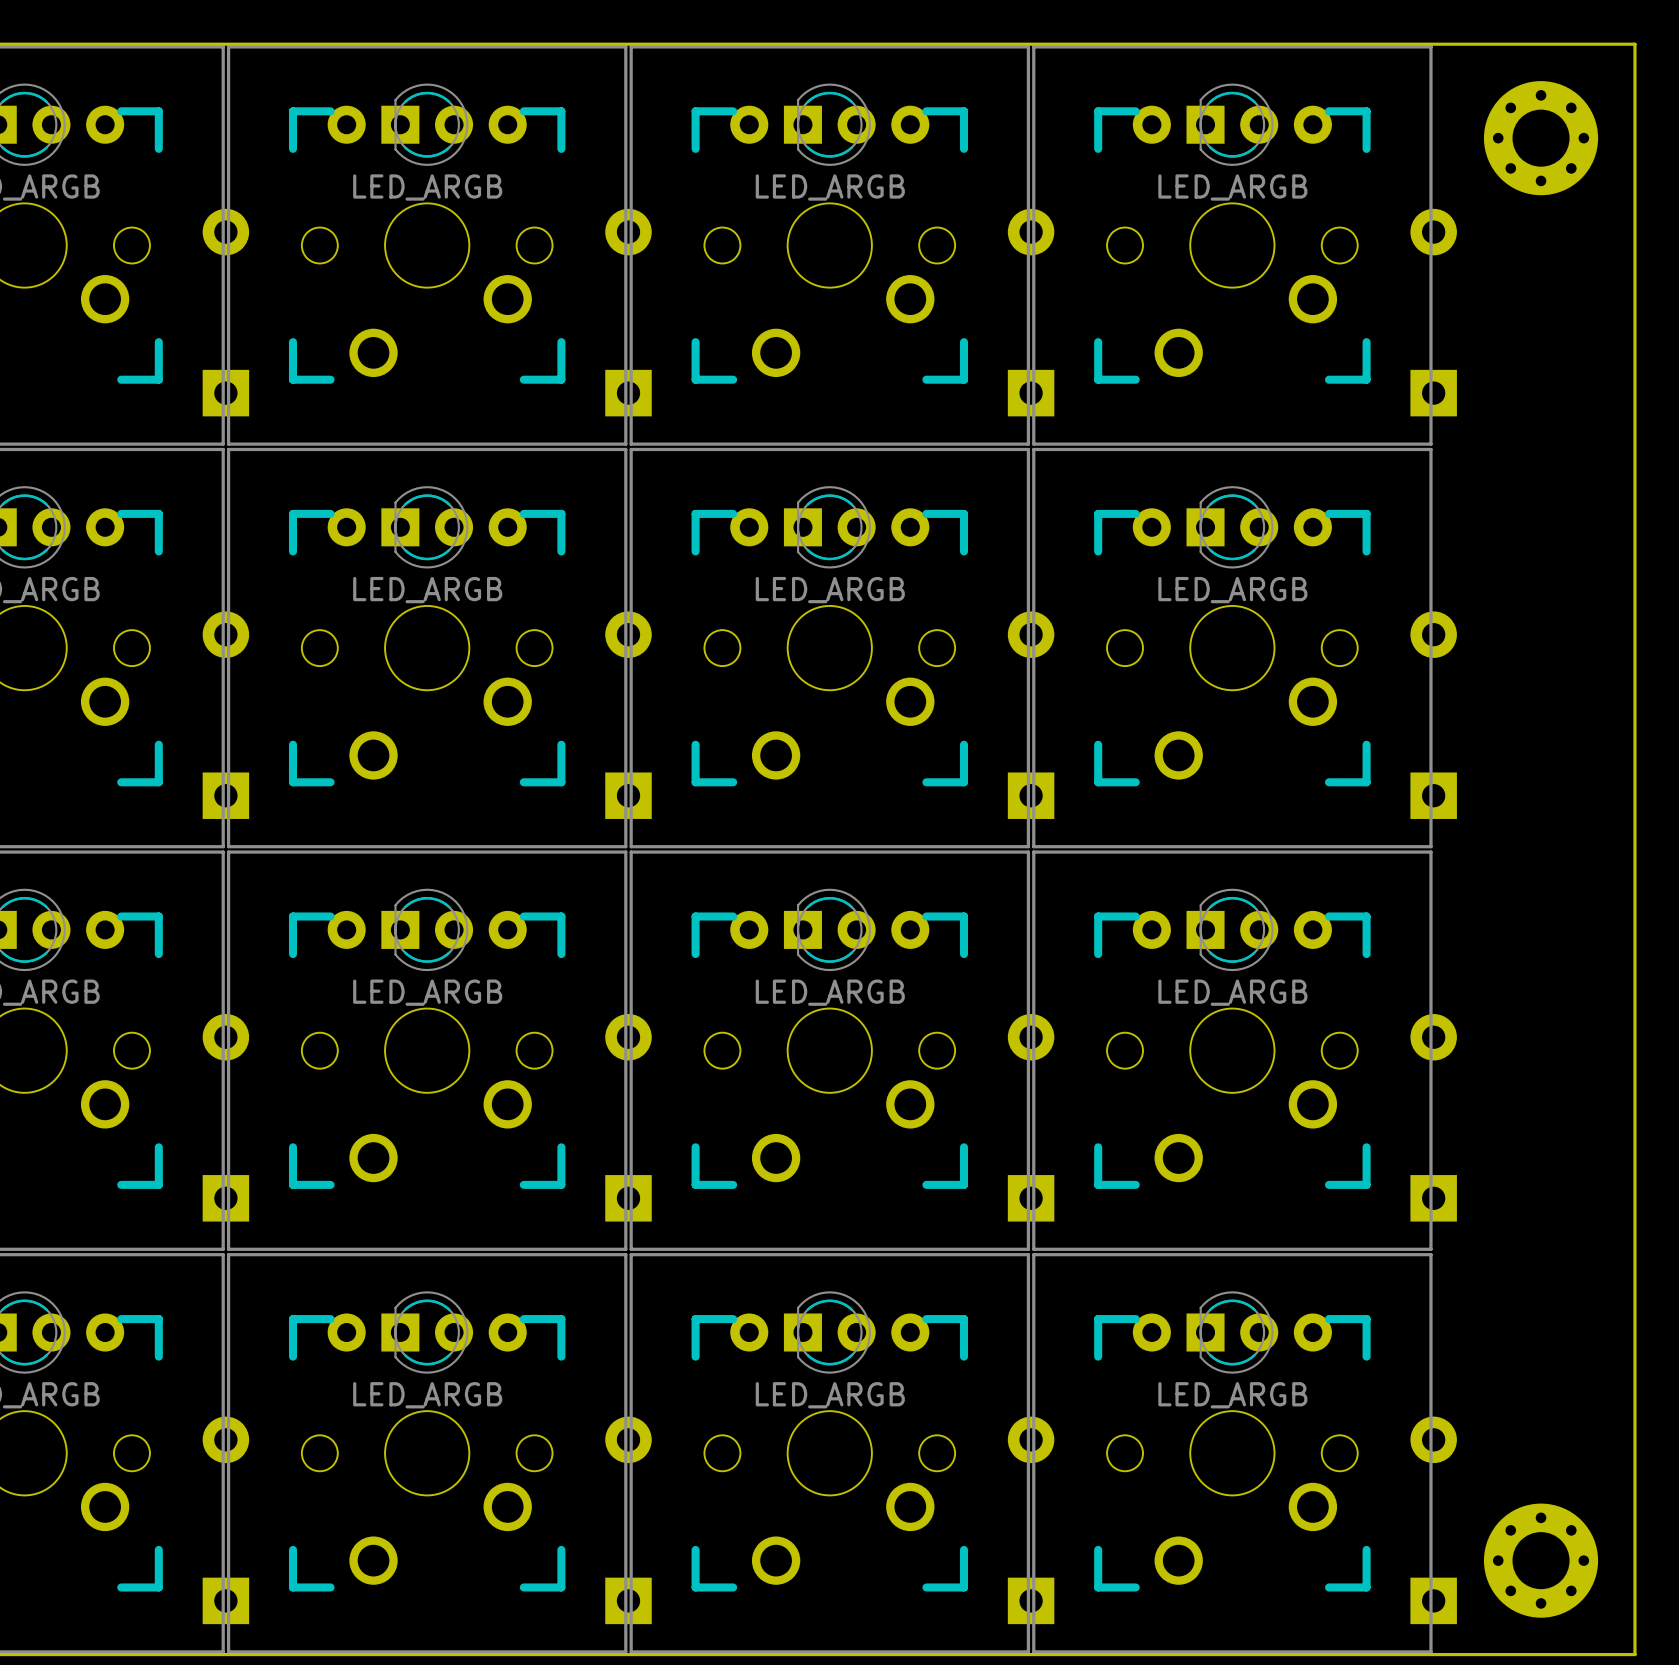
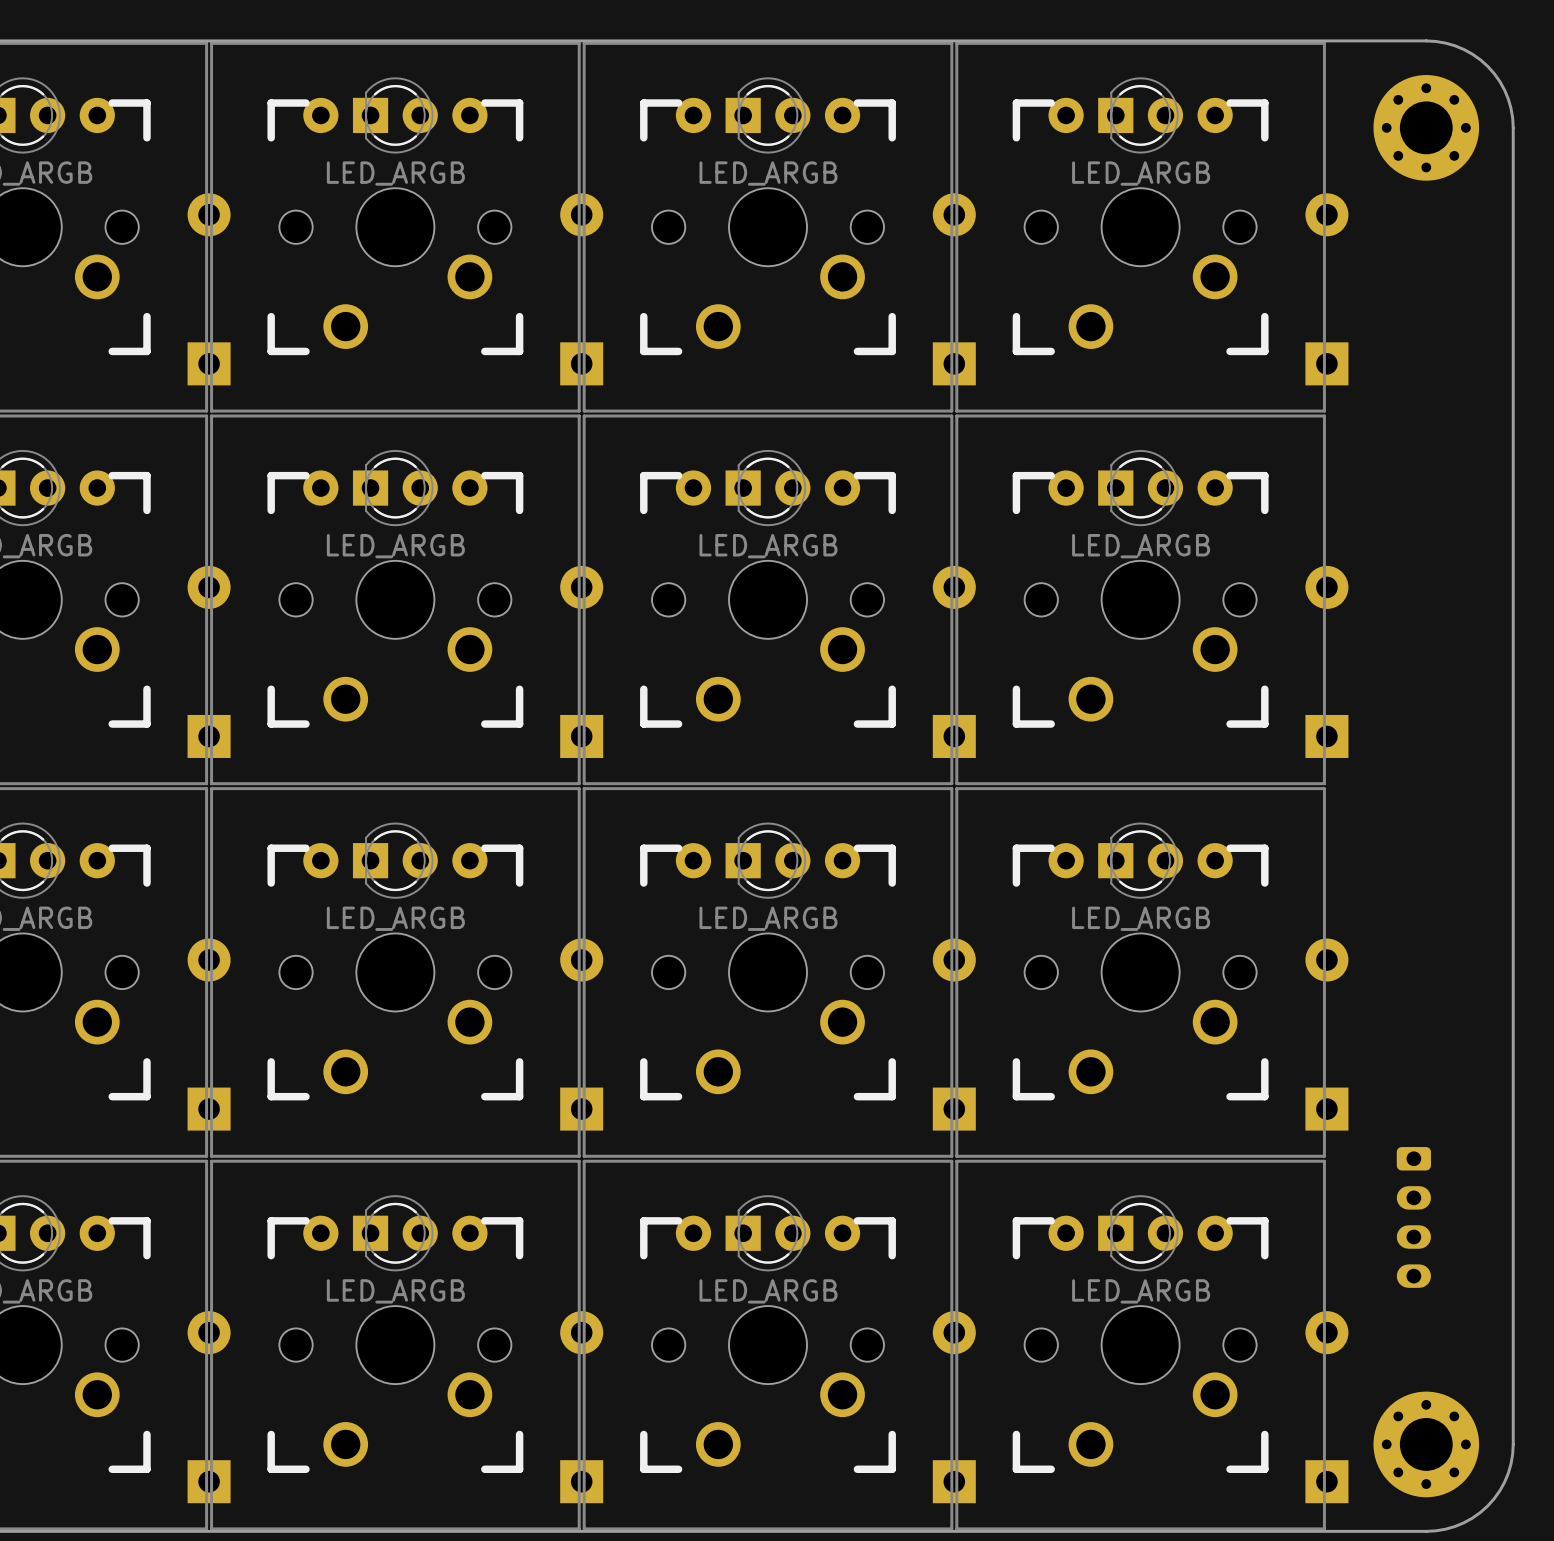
board edge: (1541, 44) (1634, 44) (1634, 138) -> (1426, 40) (1455, 45) (1472, 54) (1487, 66) (1499, 81) (1508, 99) (1513, 127)
part: none -> (1413, 1217)
board edge: (1634, 1560) (1634, 1654) (1541, 1654) -> (1513, 1444) (1508, 1473) (1499, 1490) (1487, 1505) (1472, 1518) (1455, 1526) (1426, 1531)

